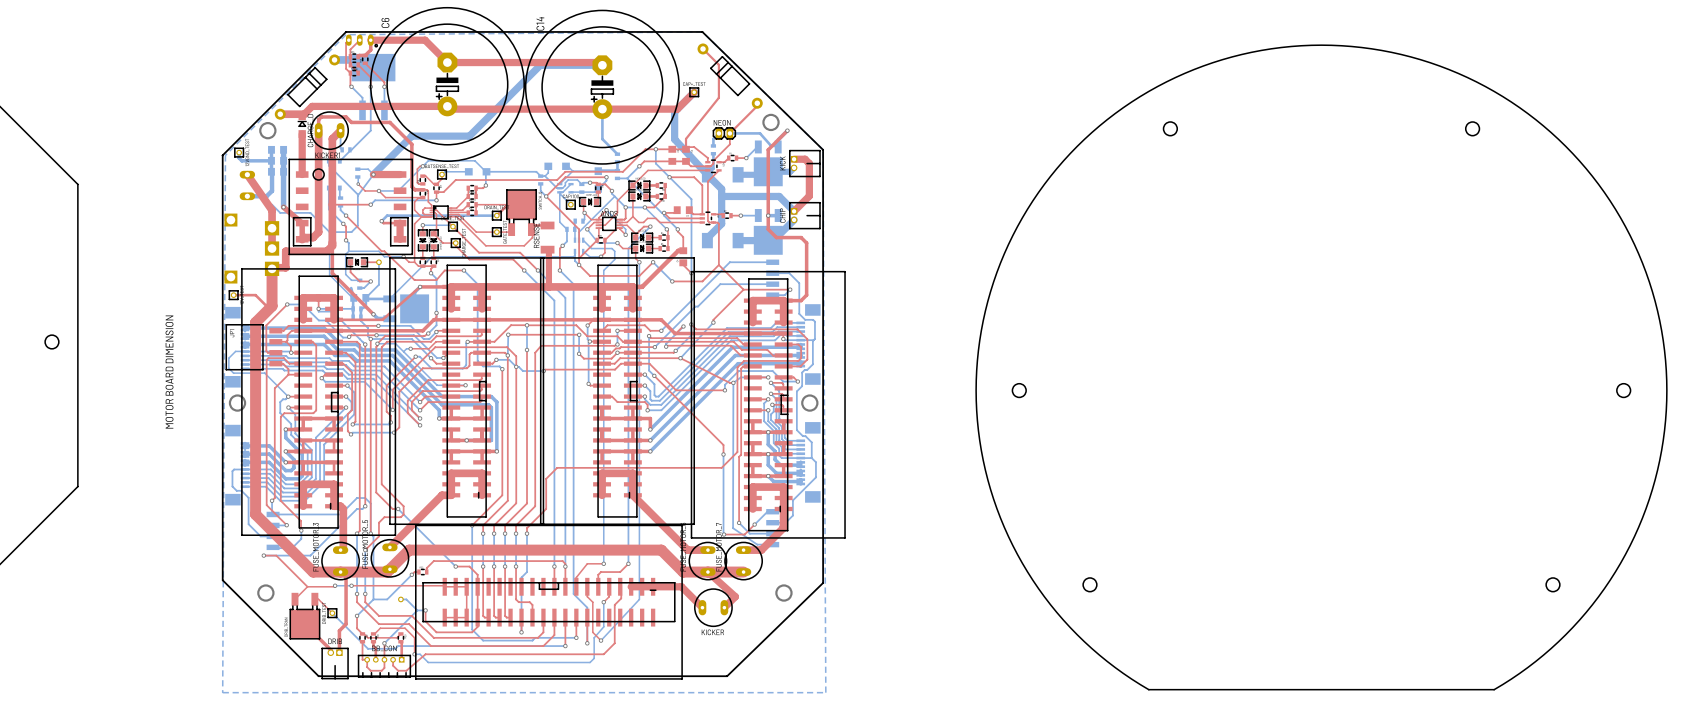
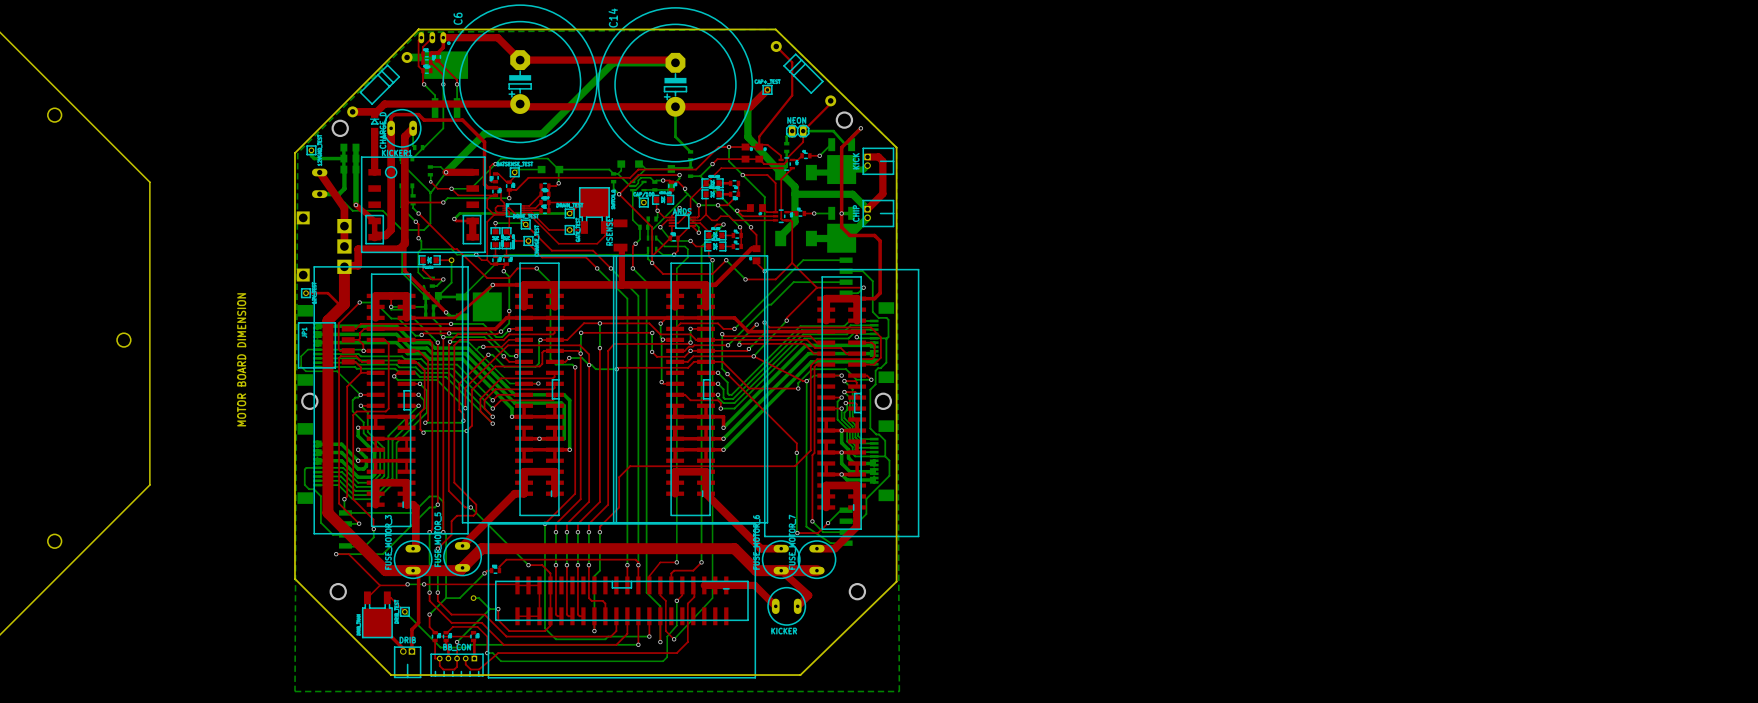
round board edge: [1163, 121, 1178, 136] -> none
round board edge: [1465, 121, 1480, 136] -> none
round board edge: [1012, 383, 1027, 398] -> none
round board edge: [1616, 383, 1631, 398] -> none
round board edge: [1083, 577, 1097, 592] -> none
round board edge: [1546, 577, 1560, 592] -> none
board edge: (1148, 689) (1494, 689) (1527, 667) (1565, 634) (1592, 604) (1620, 563) (1646, 508) (1655, 479) (1663, 440) (1666, 410) (1666, 370) (1661, 330) (1655, 301) (1642, 263) (1630, 235) (1598, 184) (1572, 153) (1551, 132) (1527, 113) (1494, 91) (1439, 66) (1401, 54) (1371, 48) (1341, 45) (1301, 45) (1261, 50) (1232, 56) (1203, 66) (1166, 81) (1131, 101) (1107, 119) (1084, 139) (1056, 168) (1022, 217) (996, 272) (987, 301) (979, 340) (976, 370) (976, 410) (981, 450) (987, 479) (996, 508) (1012, 545) (1032, 580) (1050, 604) (1070, 627) (1099, 655) (1148, 689) -> none

